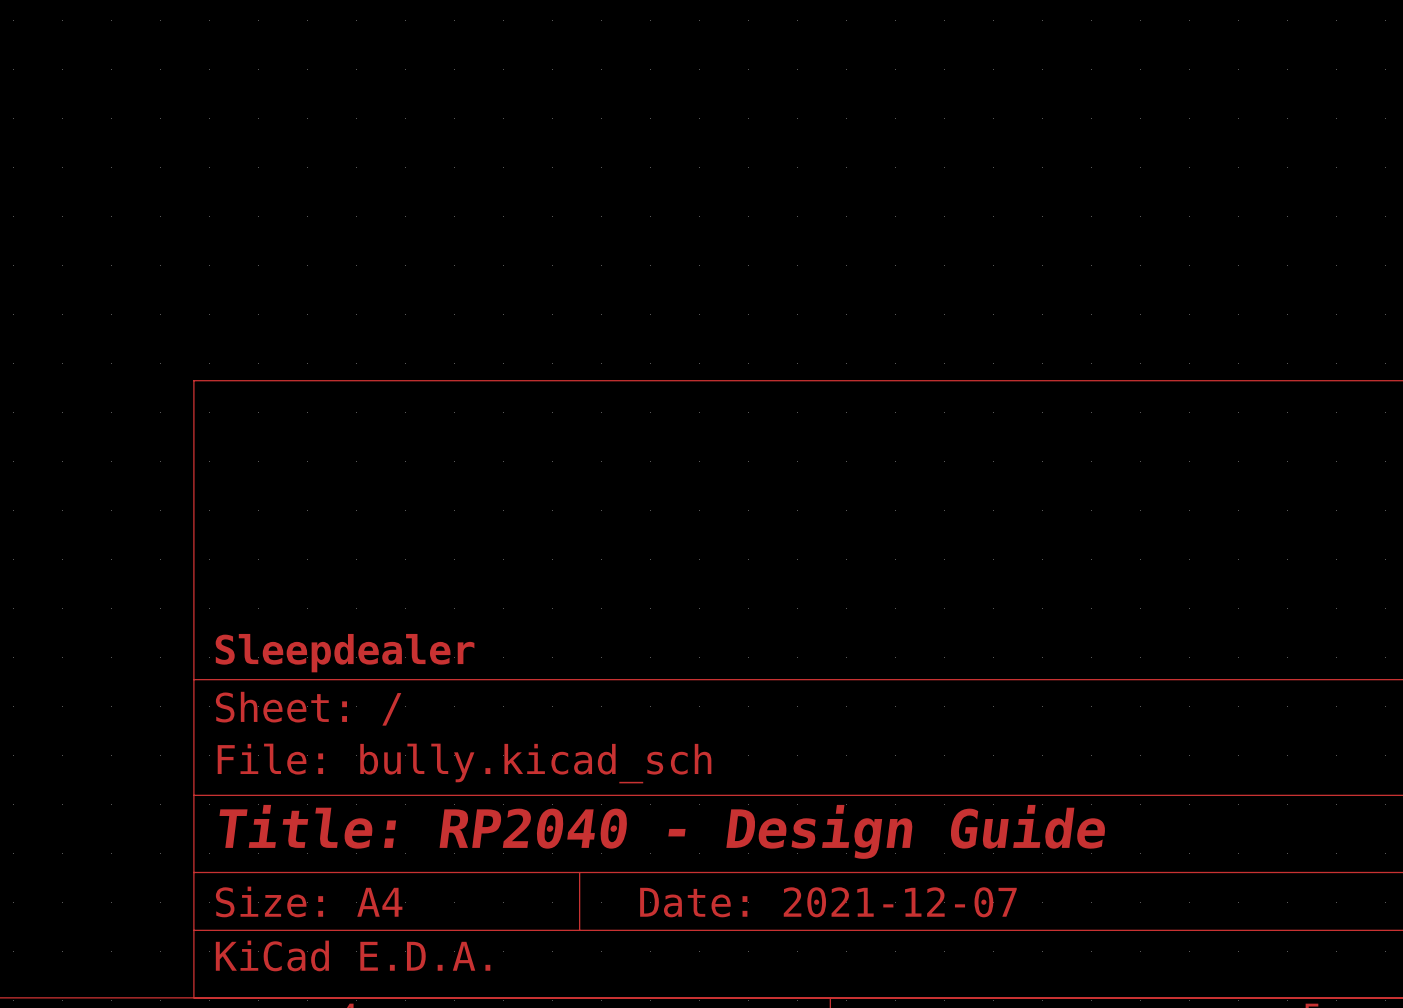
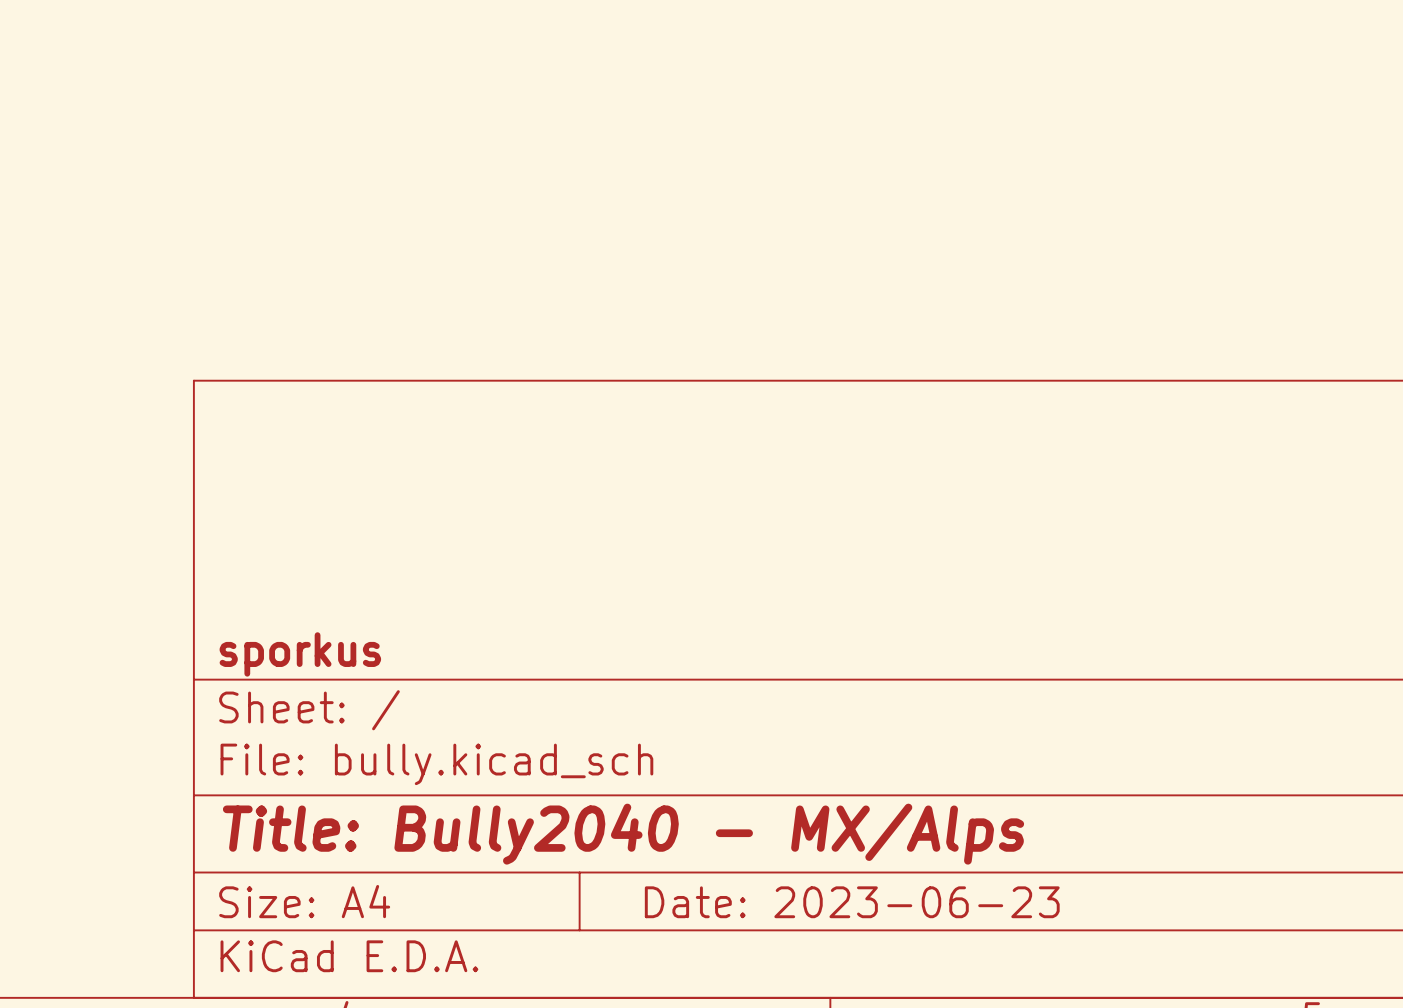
title block: Sleepdealer (345, 653) -> sporkus (300, 654)
title block: Title: RP2040 - Design Guide (662, 831) -> Title: Bully2040 - MX/Alps (623, 834)
title block: Date: 2021-12-07 (828, 902) -> Date: 2023-06-23 (852, 902)

